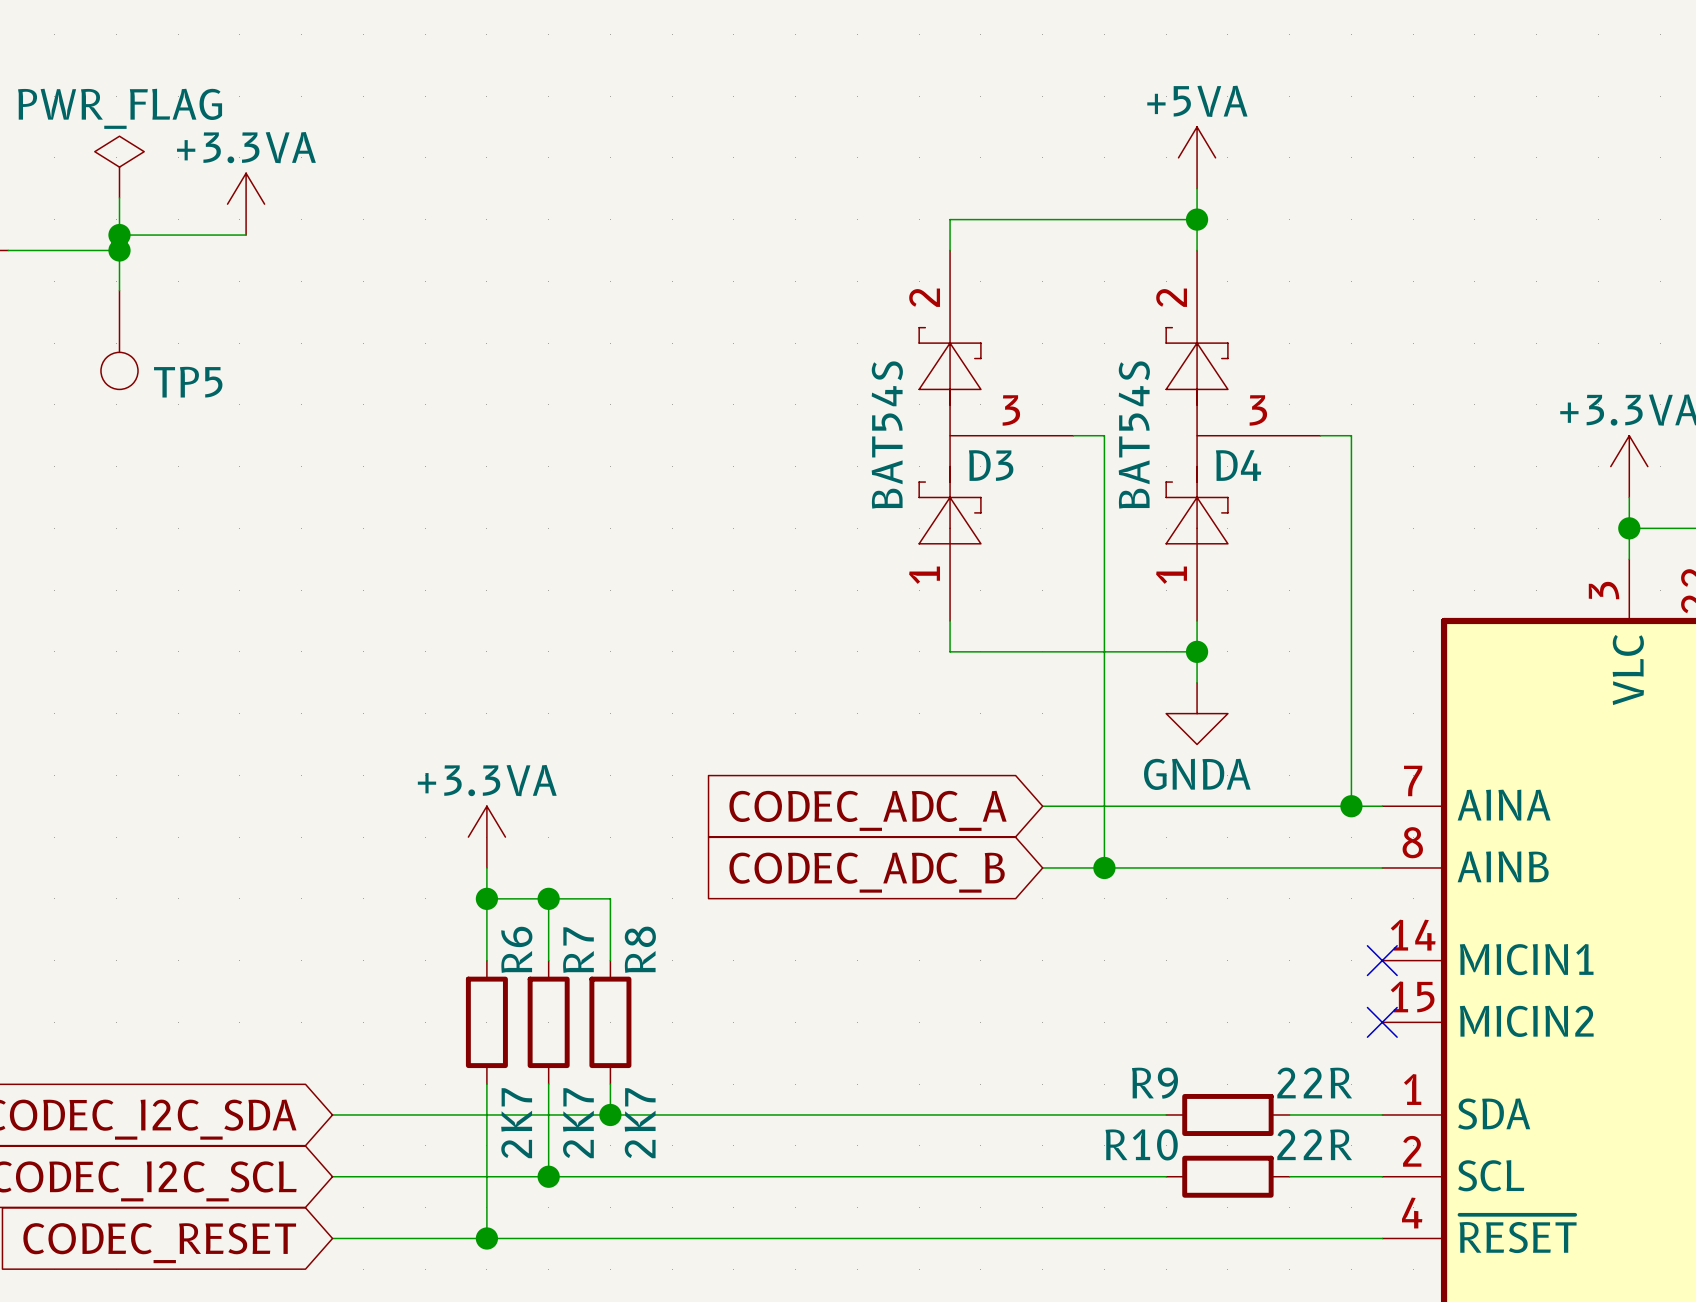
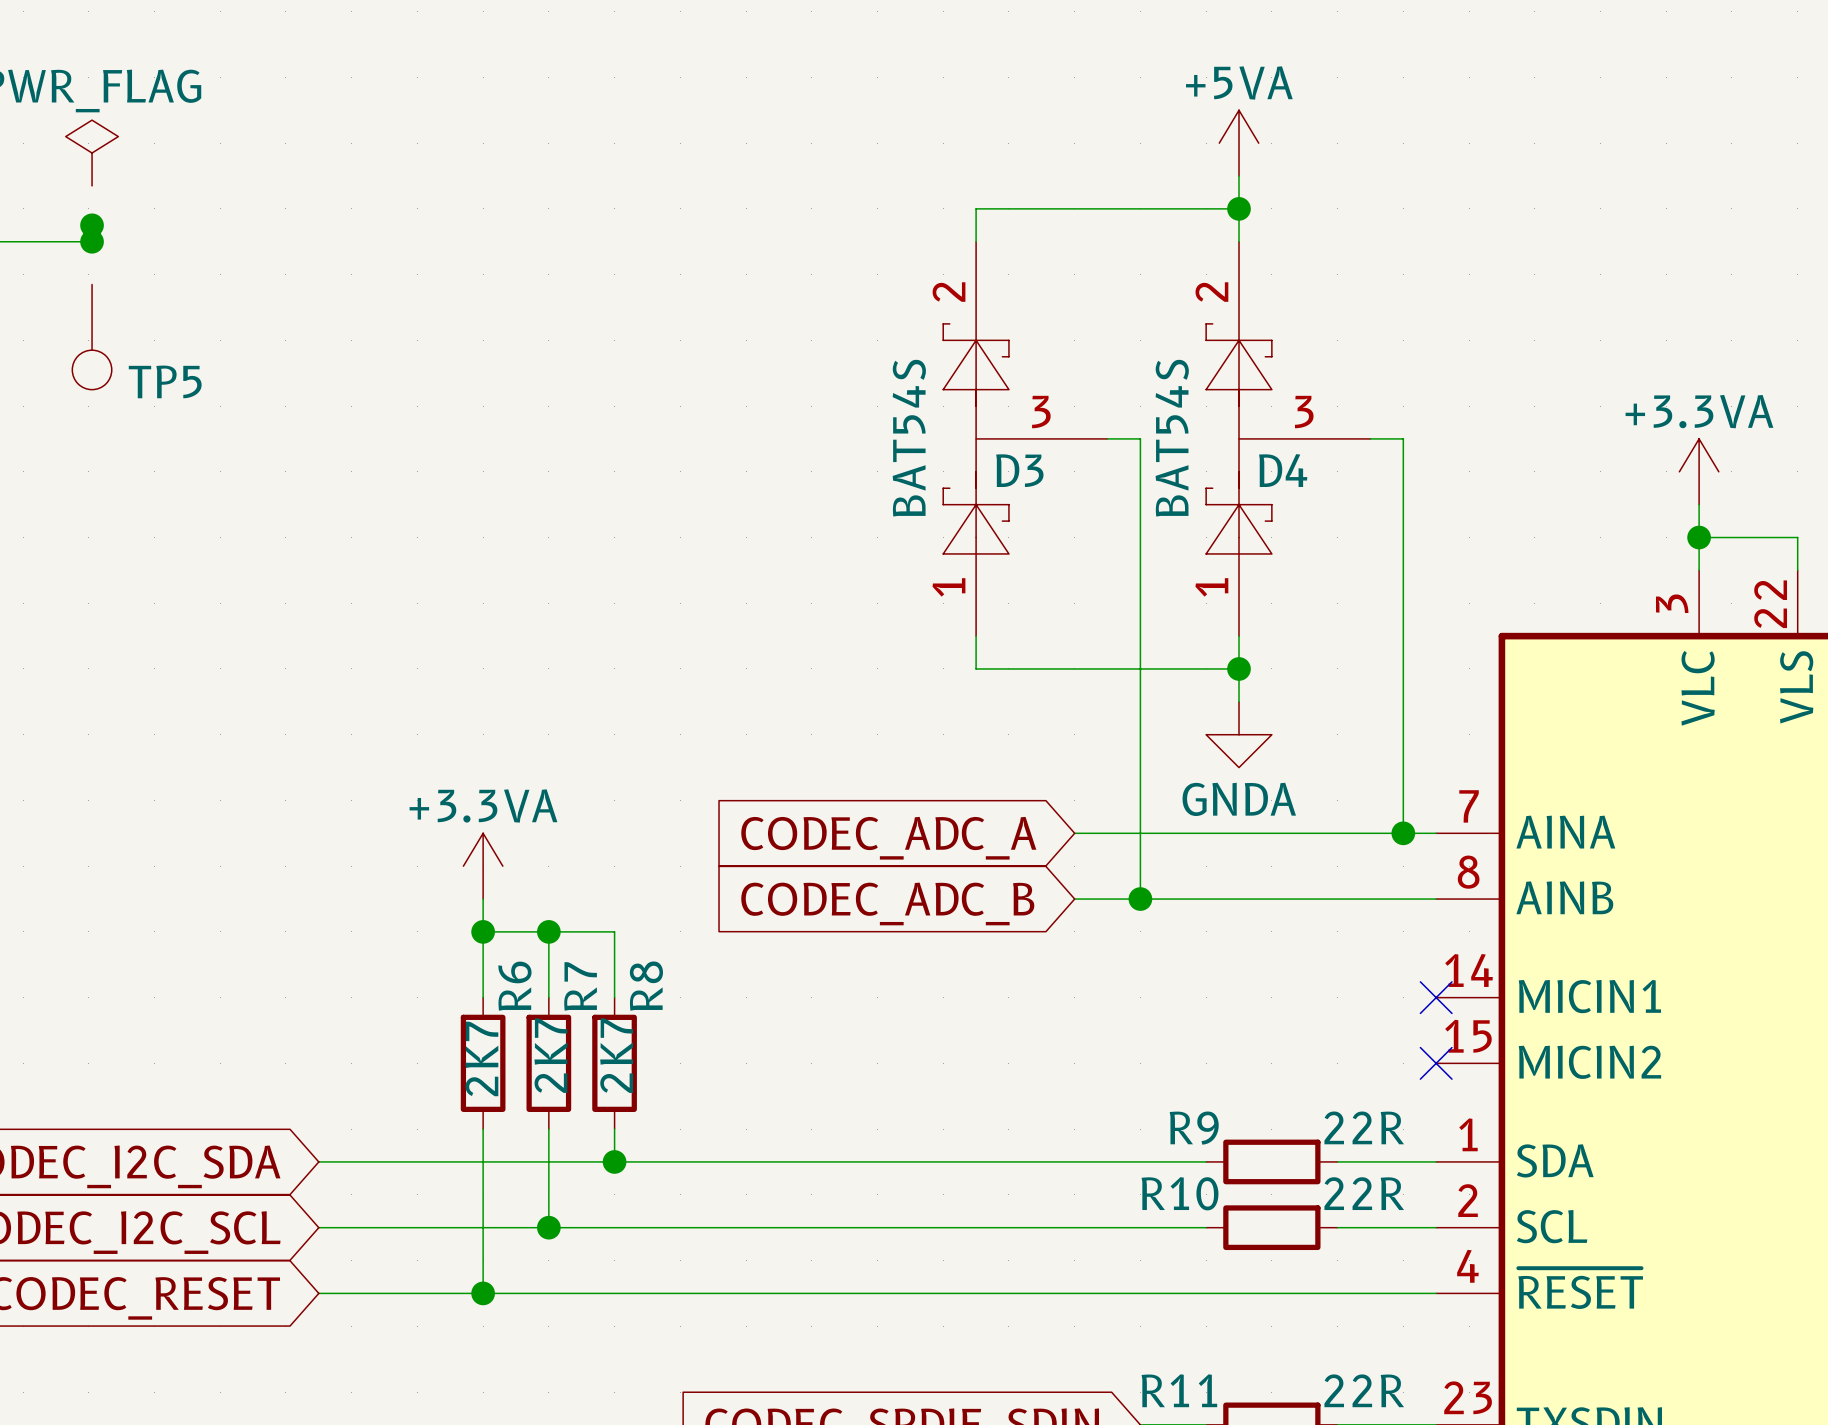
wire: (119, 197) (119, 290) -> none
power symbol: +3.3VA (246, 204) -> none
wire: (119, 235) (246, 235) -> none
R6 value position: 2K7 (516, 1123) -> 2K7 (481, 1058)
R7 value position: 2K7 (578, 1123) -> 2K7 (550, 1055)
R8 value position: 2K7 (640, 1123) -> 2K7 (616, 1055)

